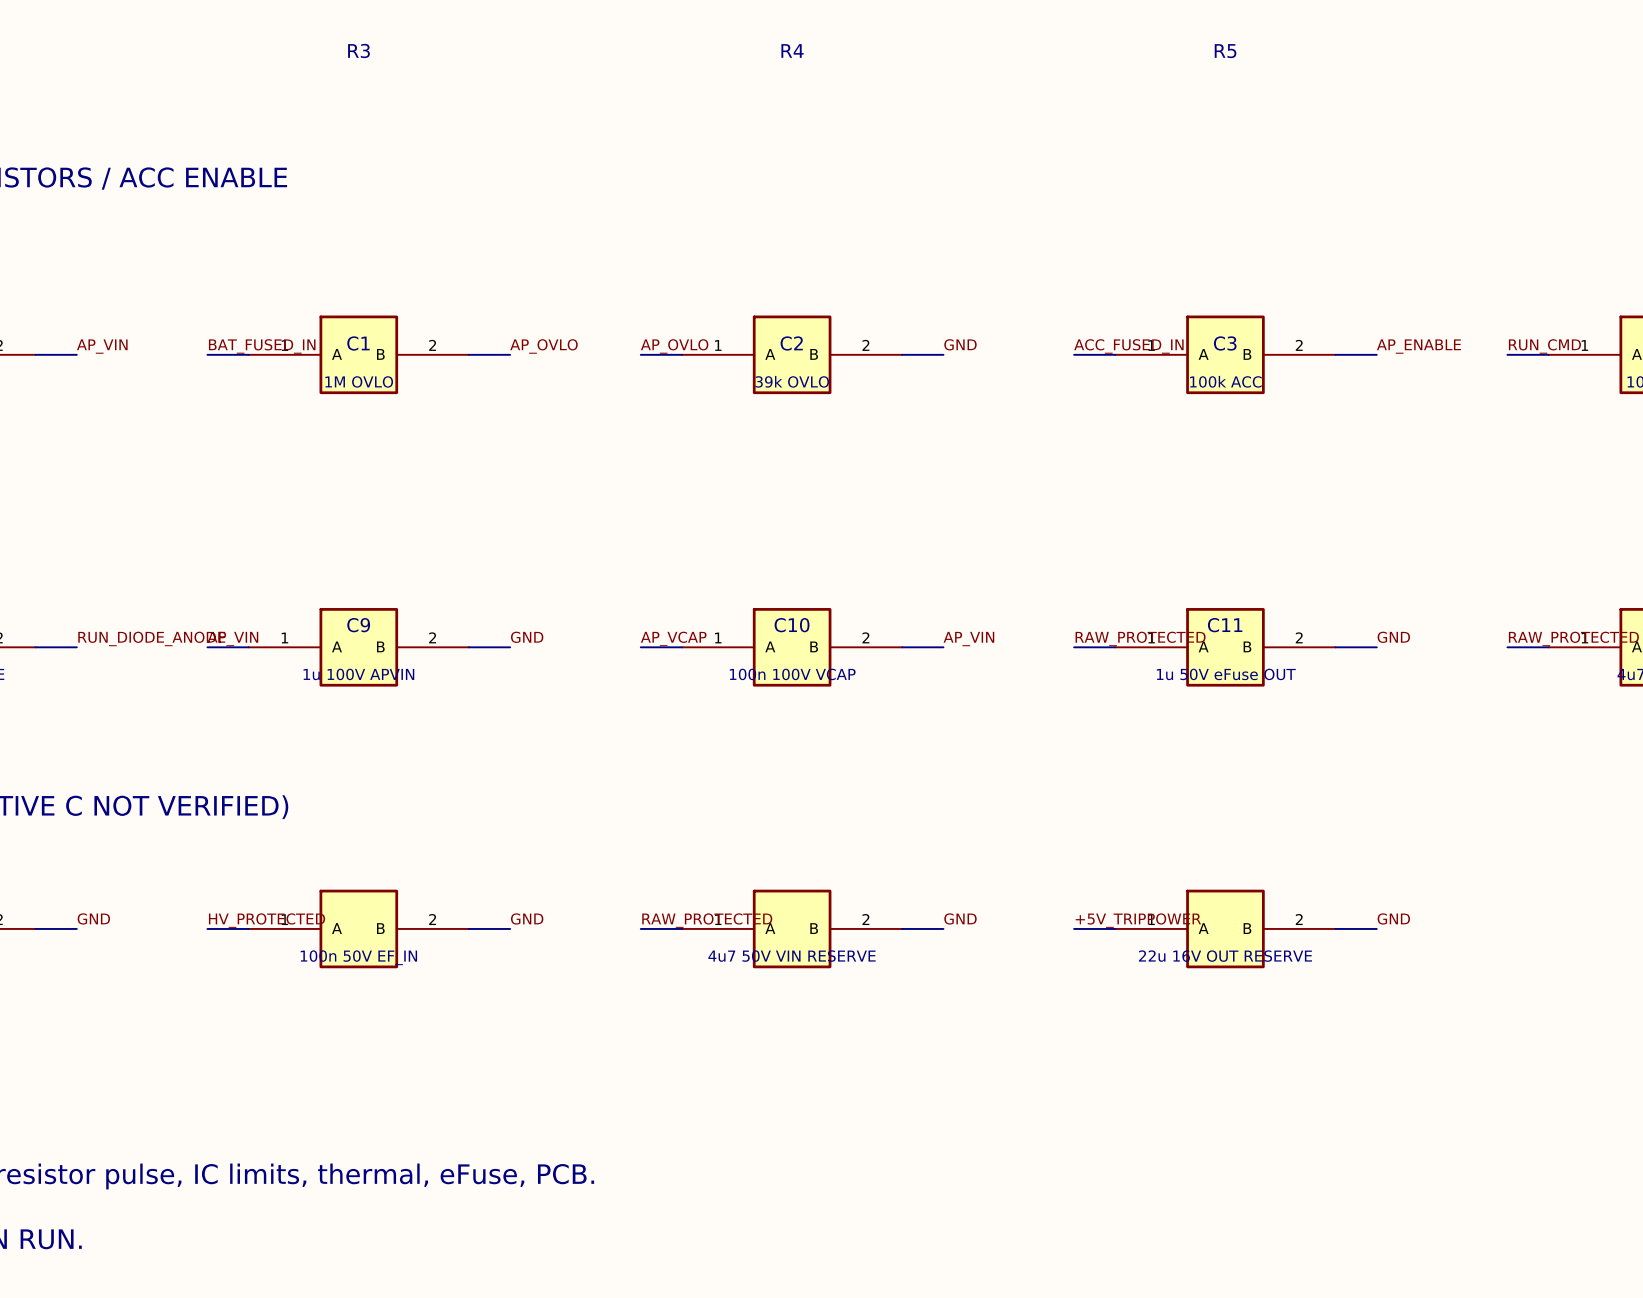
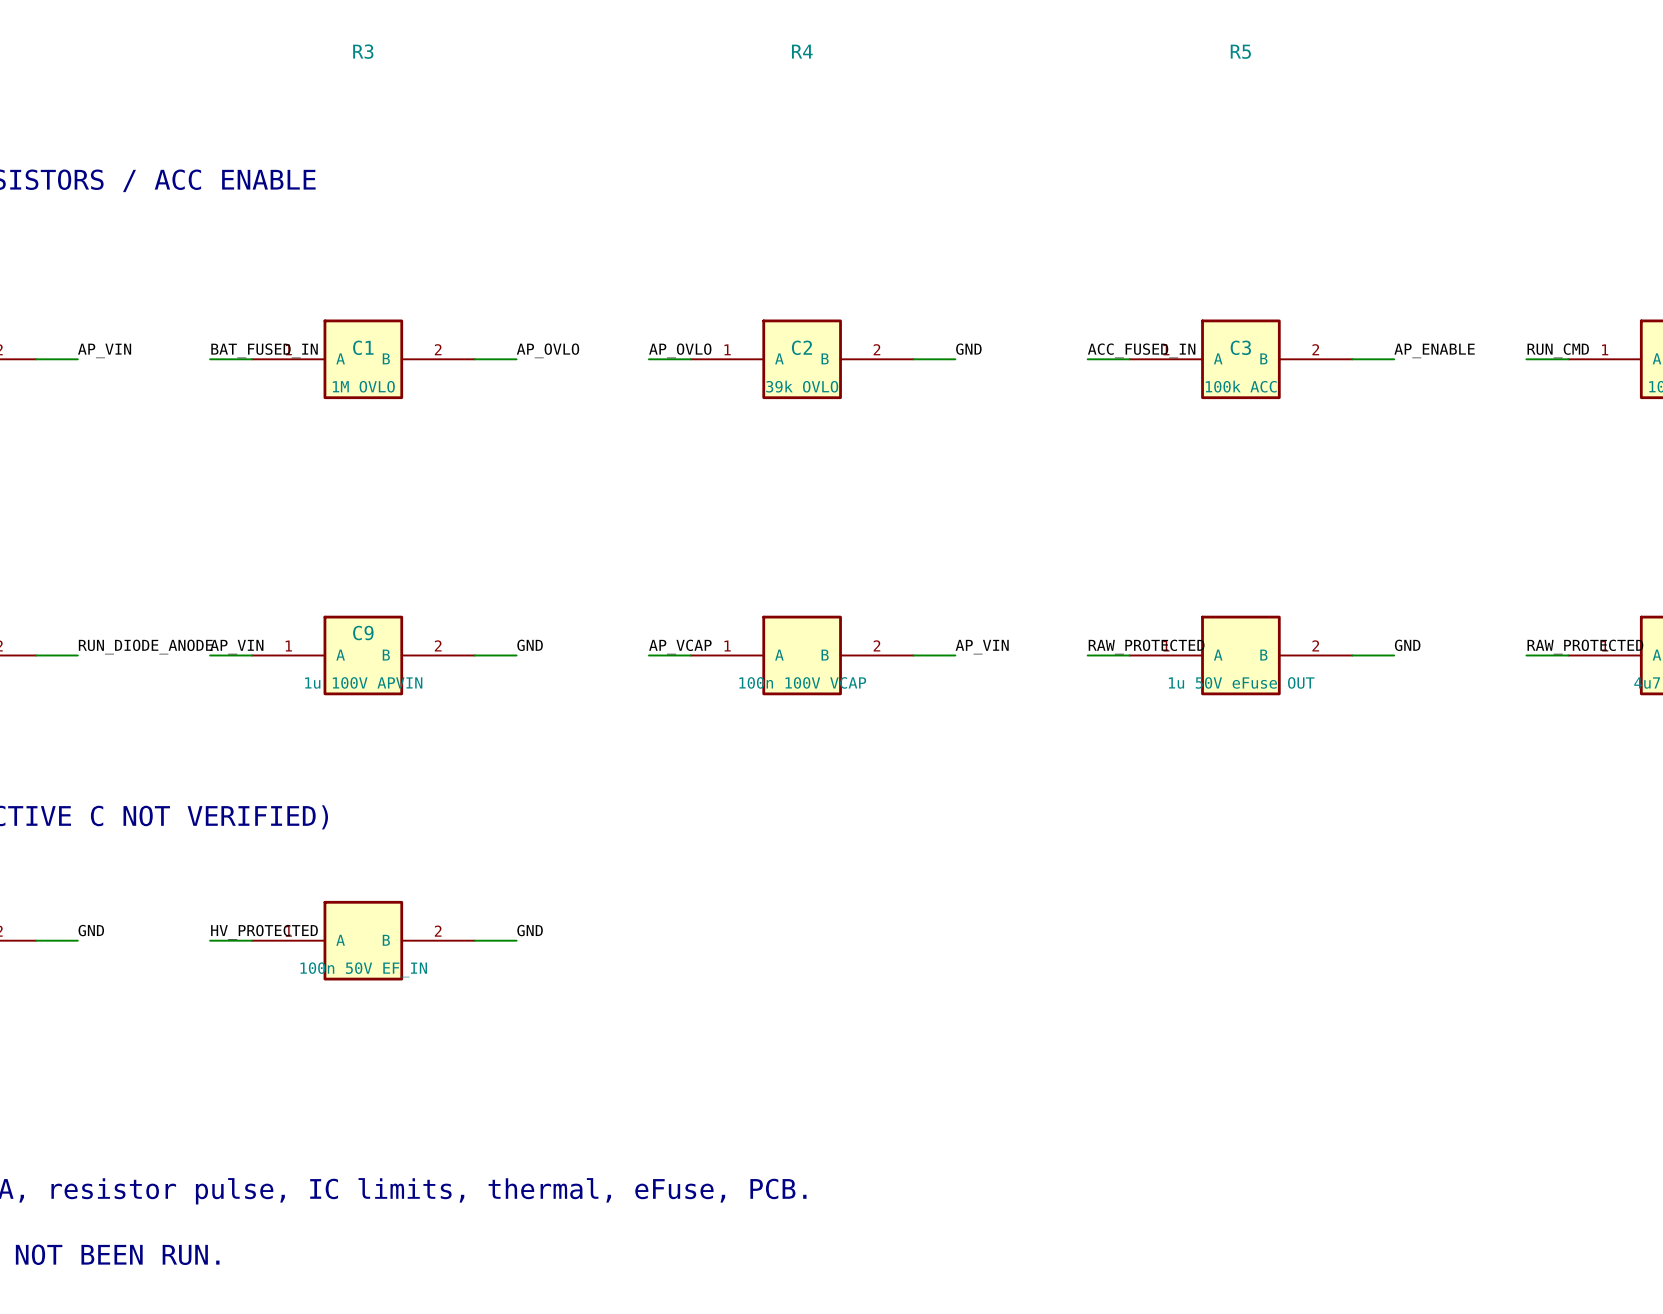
label: GND (960, 918) -> none
label: GND (1393, 918) -> none
label: RAW_PROTECTED (707, 920) -> none
label: +5V_TRIPPOWER (1138, 920) -> none
wire: (640, 928) (682, 928) -> none
C10: 4u7 50V VIN RESERVE (792, 928) -> none
wire: (902, 928) (943, 928) -> none
wire: (1074, 928) (1115, 928) -> none
C11: 22u 16V OUT RESERVE (1225, 928) -> none
wire: (1335, 928) (1376, 928) -> none

